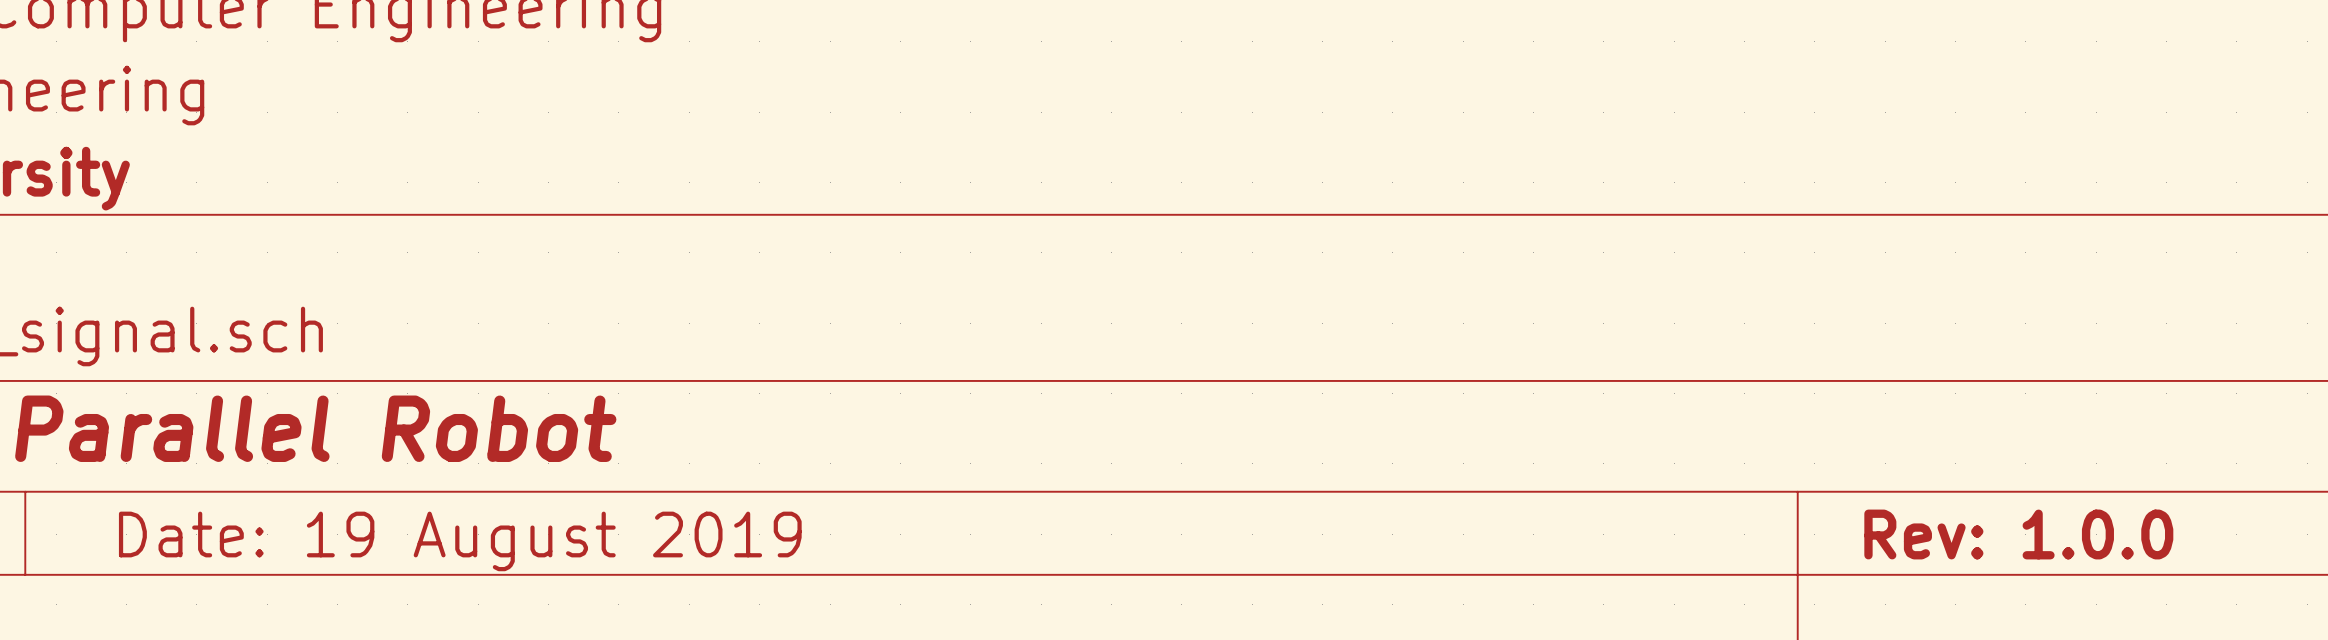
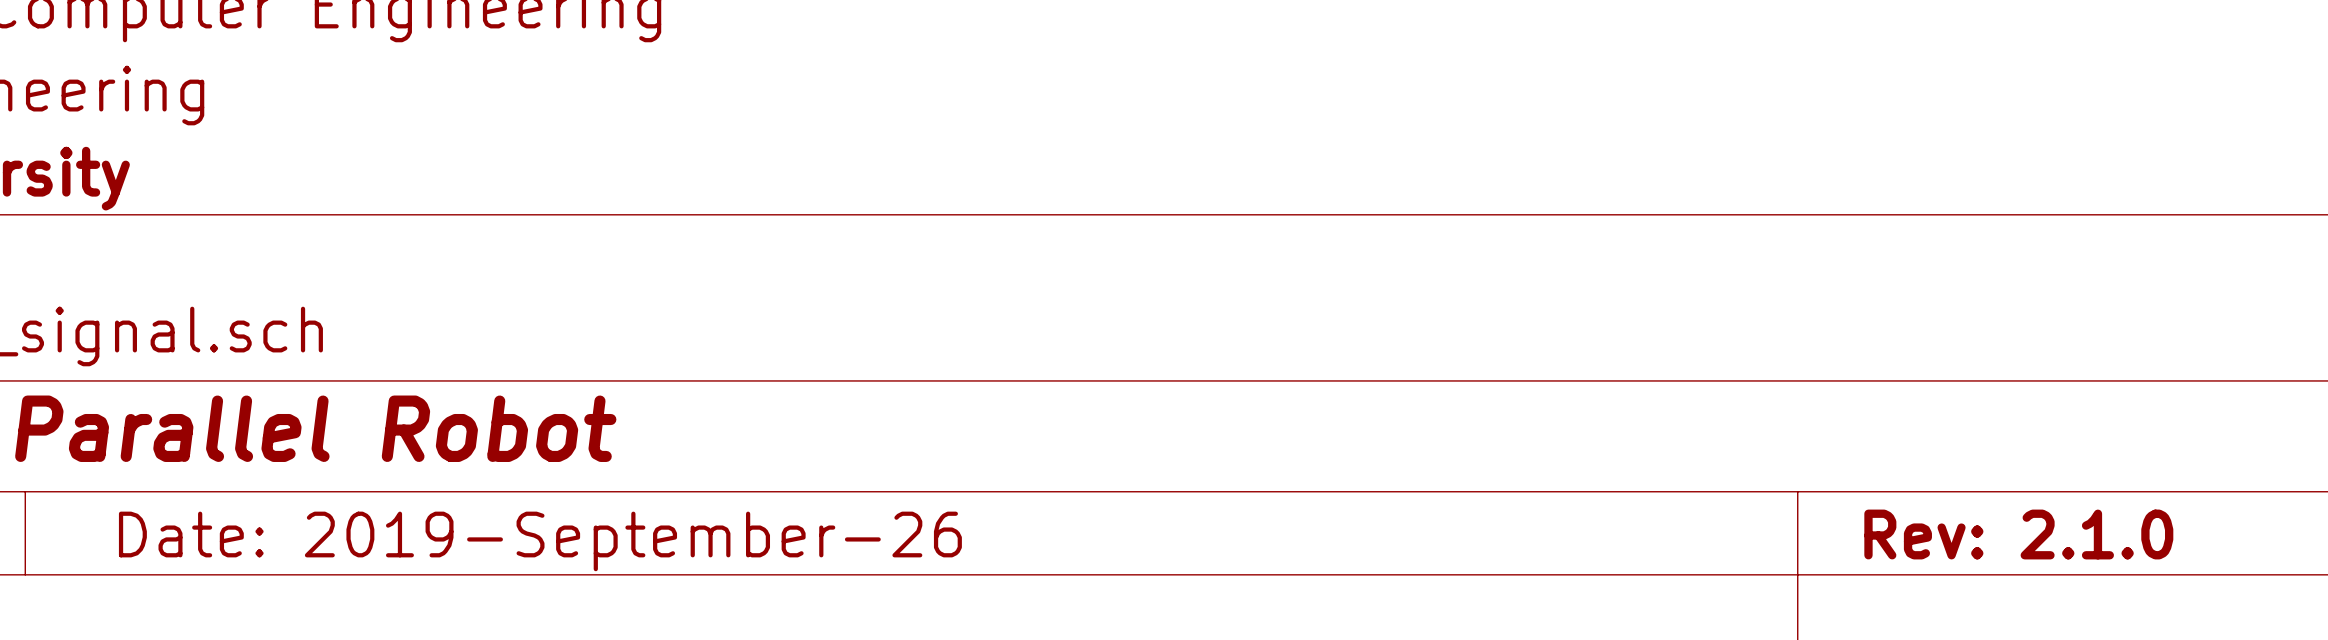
title block: Rev: 1.0.0 (2018, 534) -> Rev: 2.1.0 (2018, 534)
title block: Date: 19 August 2019 (460, 541) -> Date: 2019-September-26 (540, 541)

